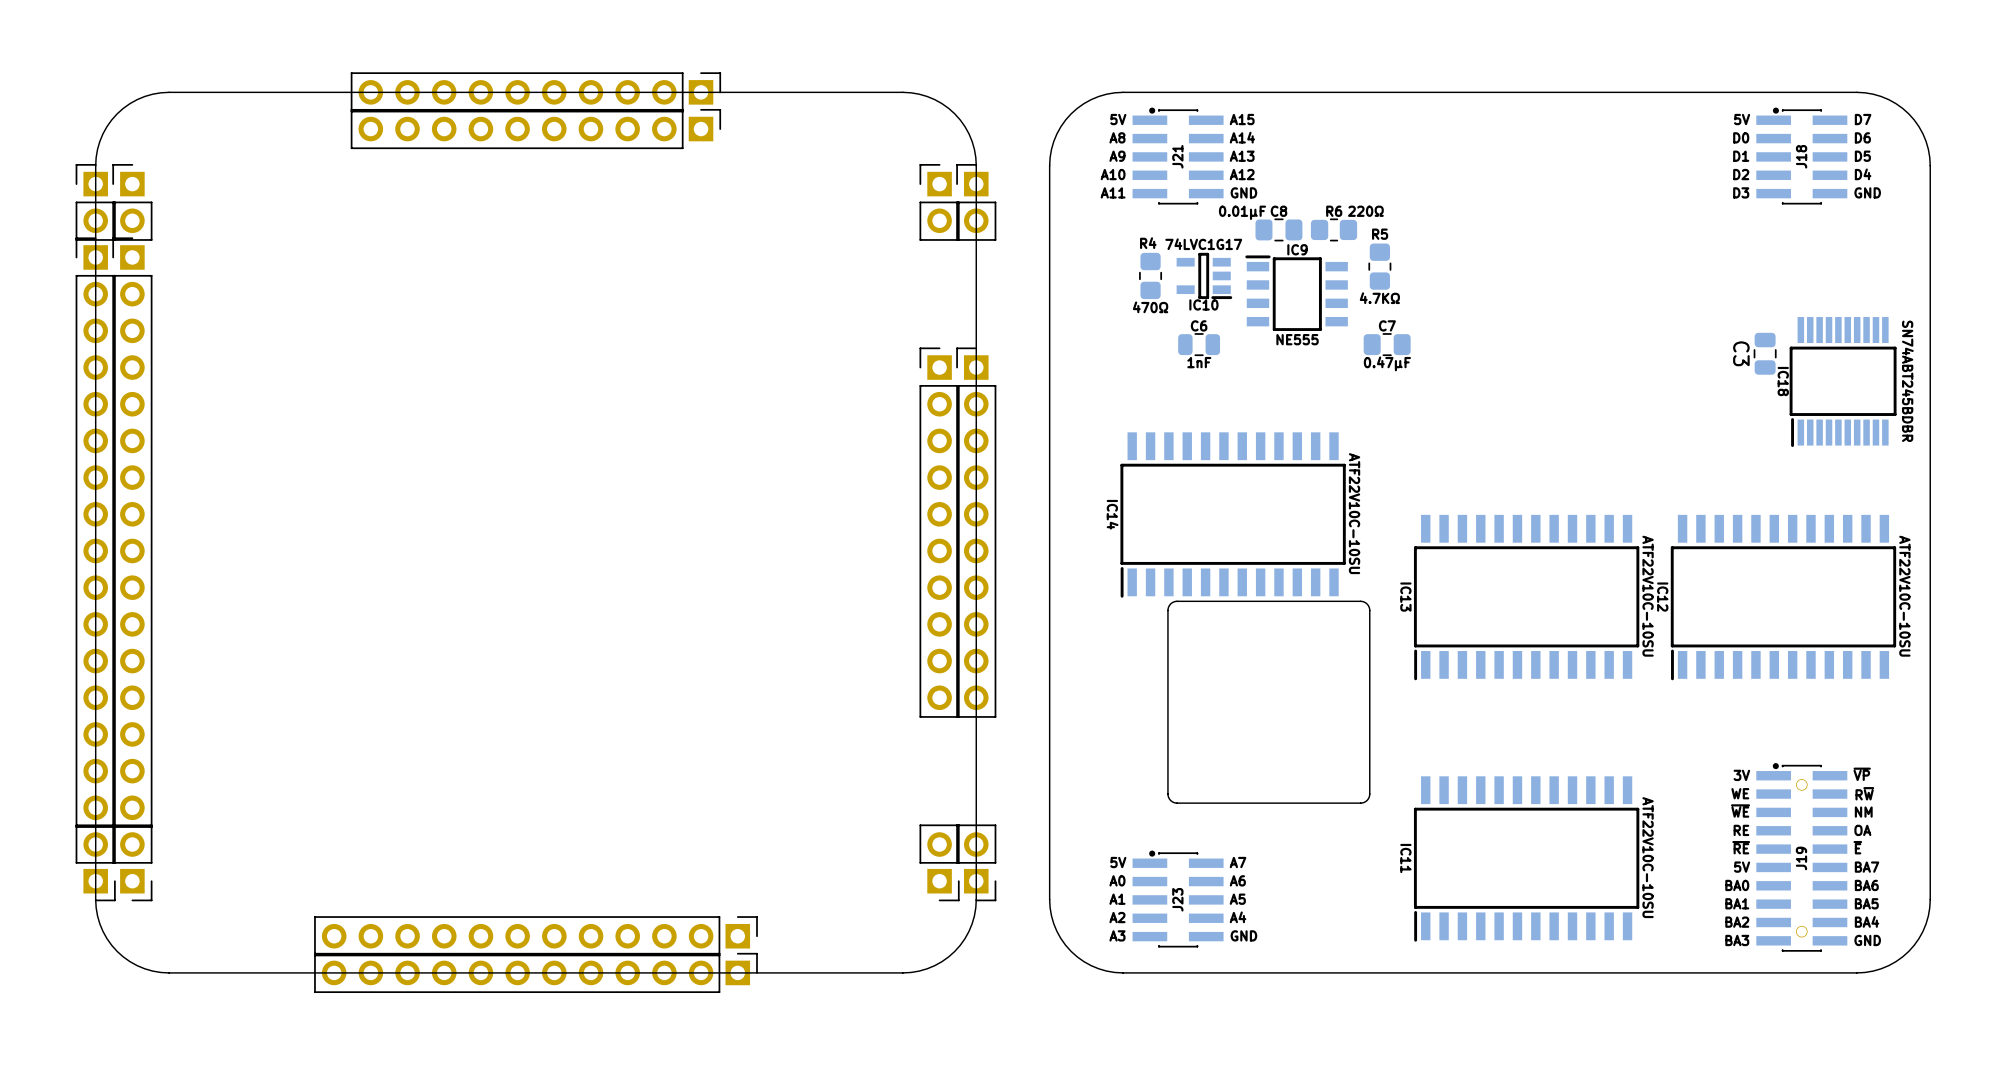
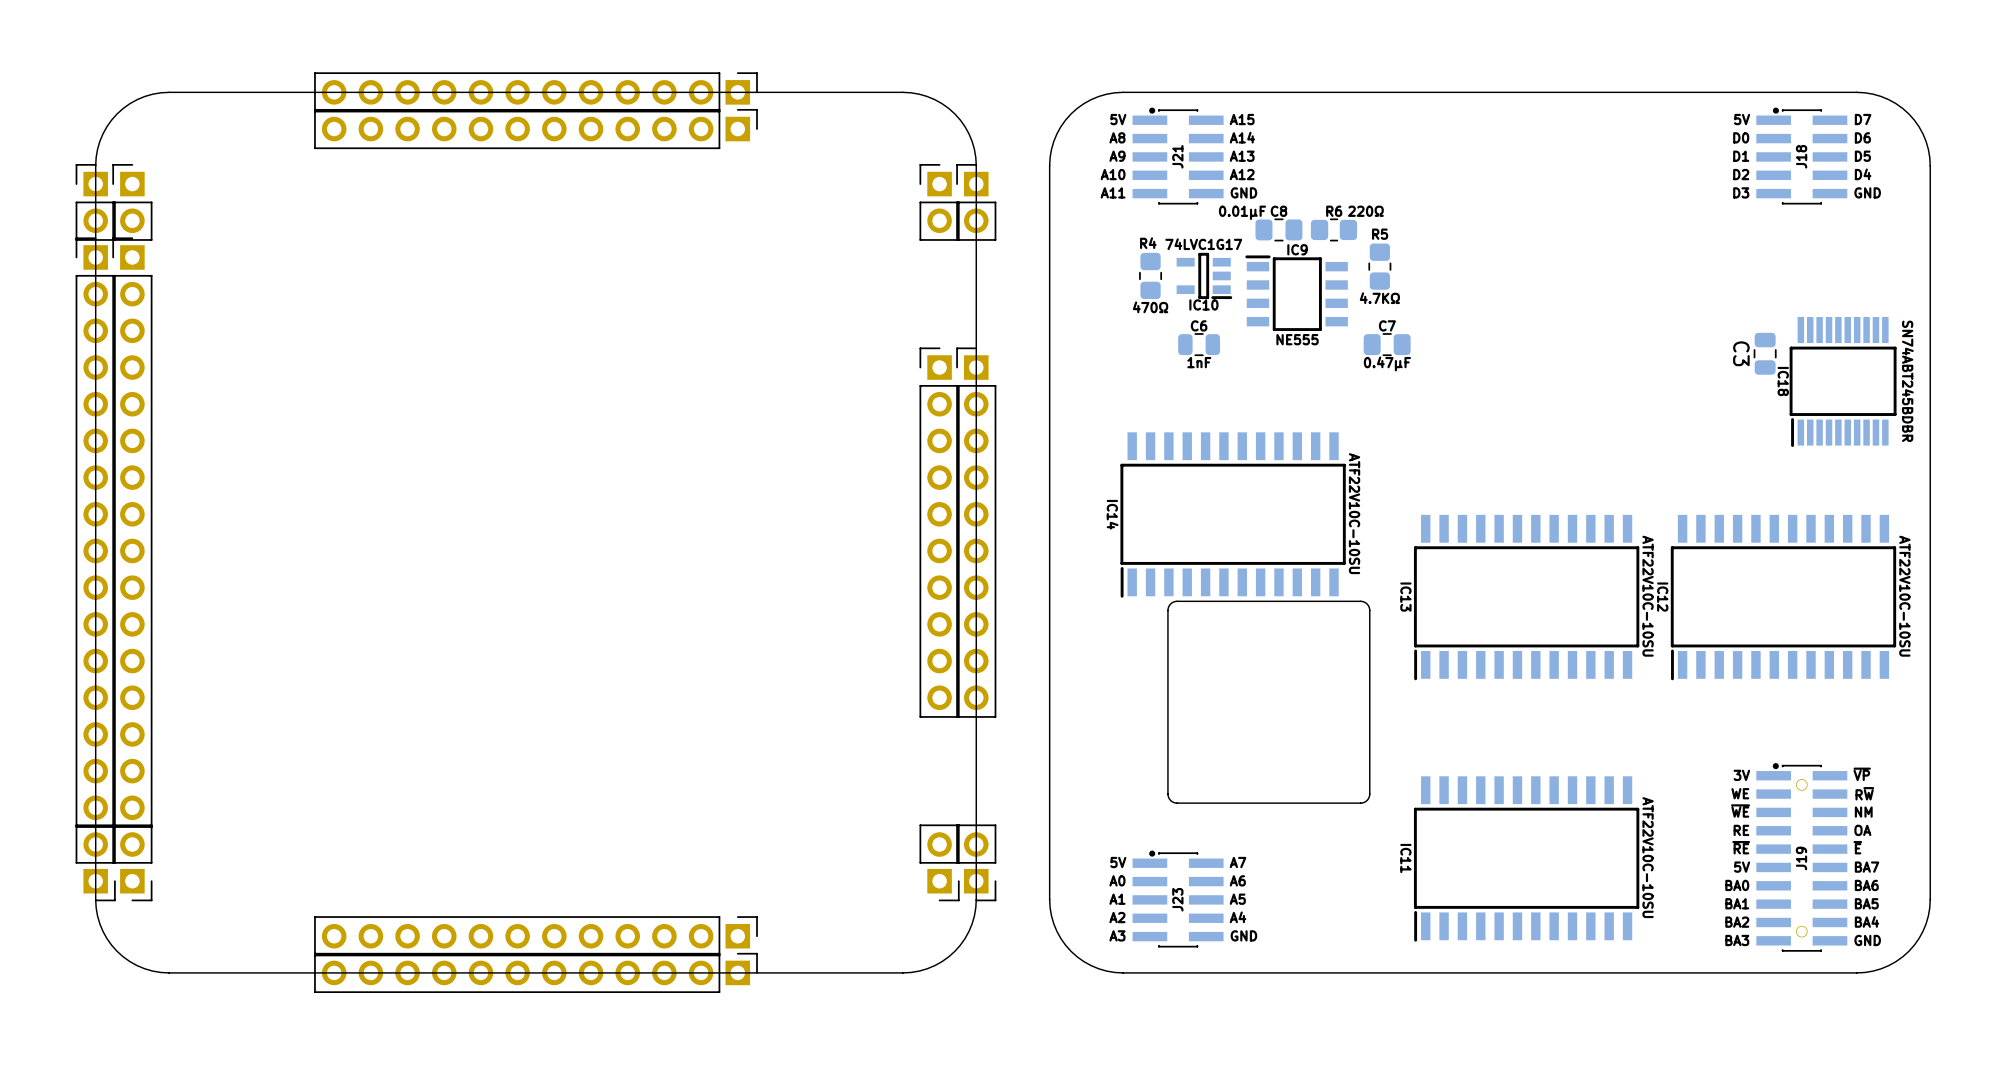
part footprint: [350, 72, 722, 113] -> [314, 72, 758, 113]
part footprint: [350, 108, 722, 150] -> [314, 108, 758, 150]

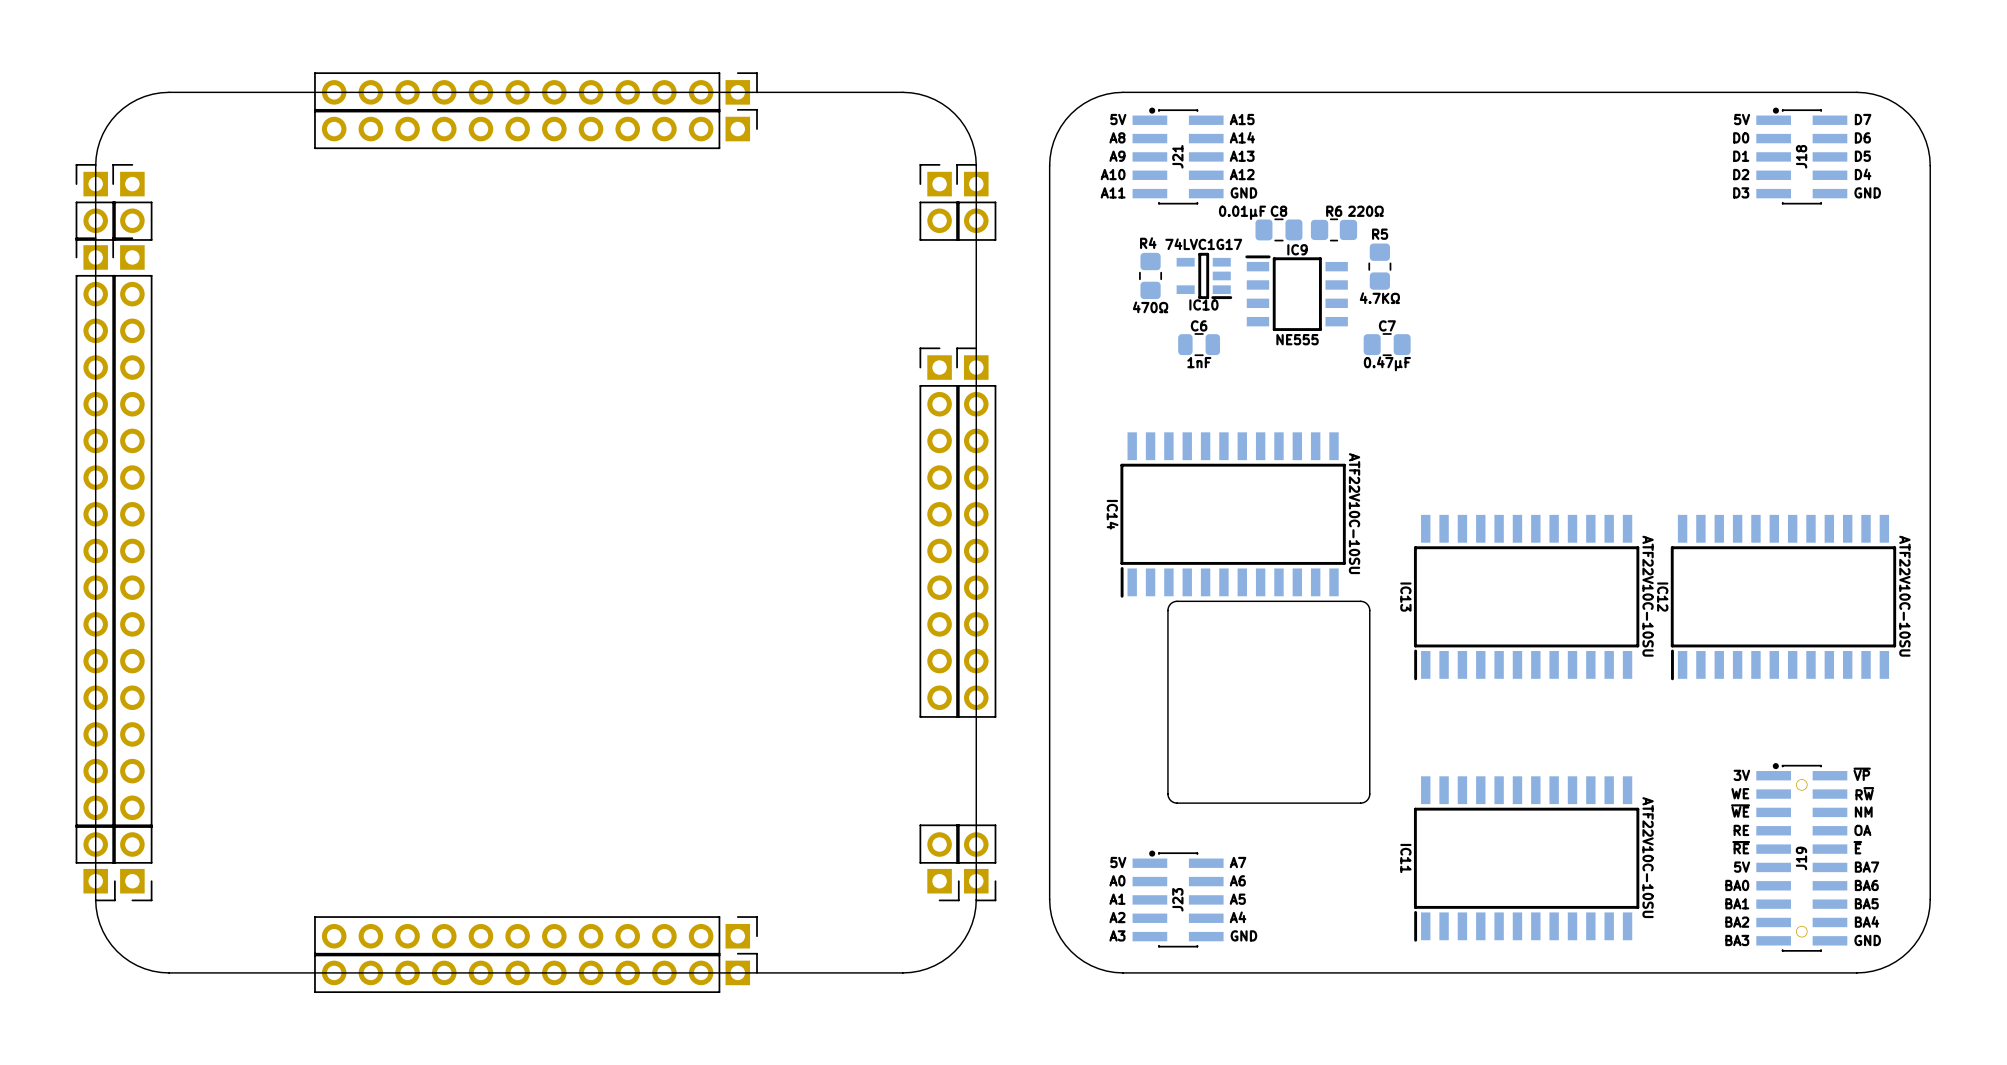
C3: (1765, 353) -> none
IC18: SN74ABT245BDBR (1843, 382) -> none

